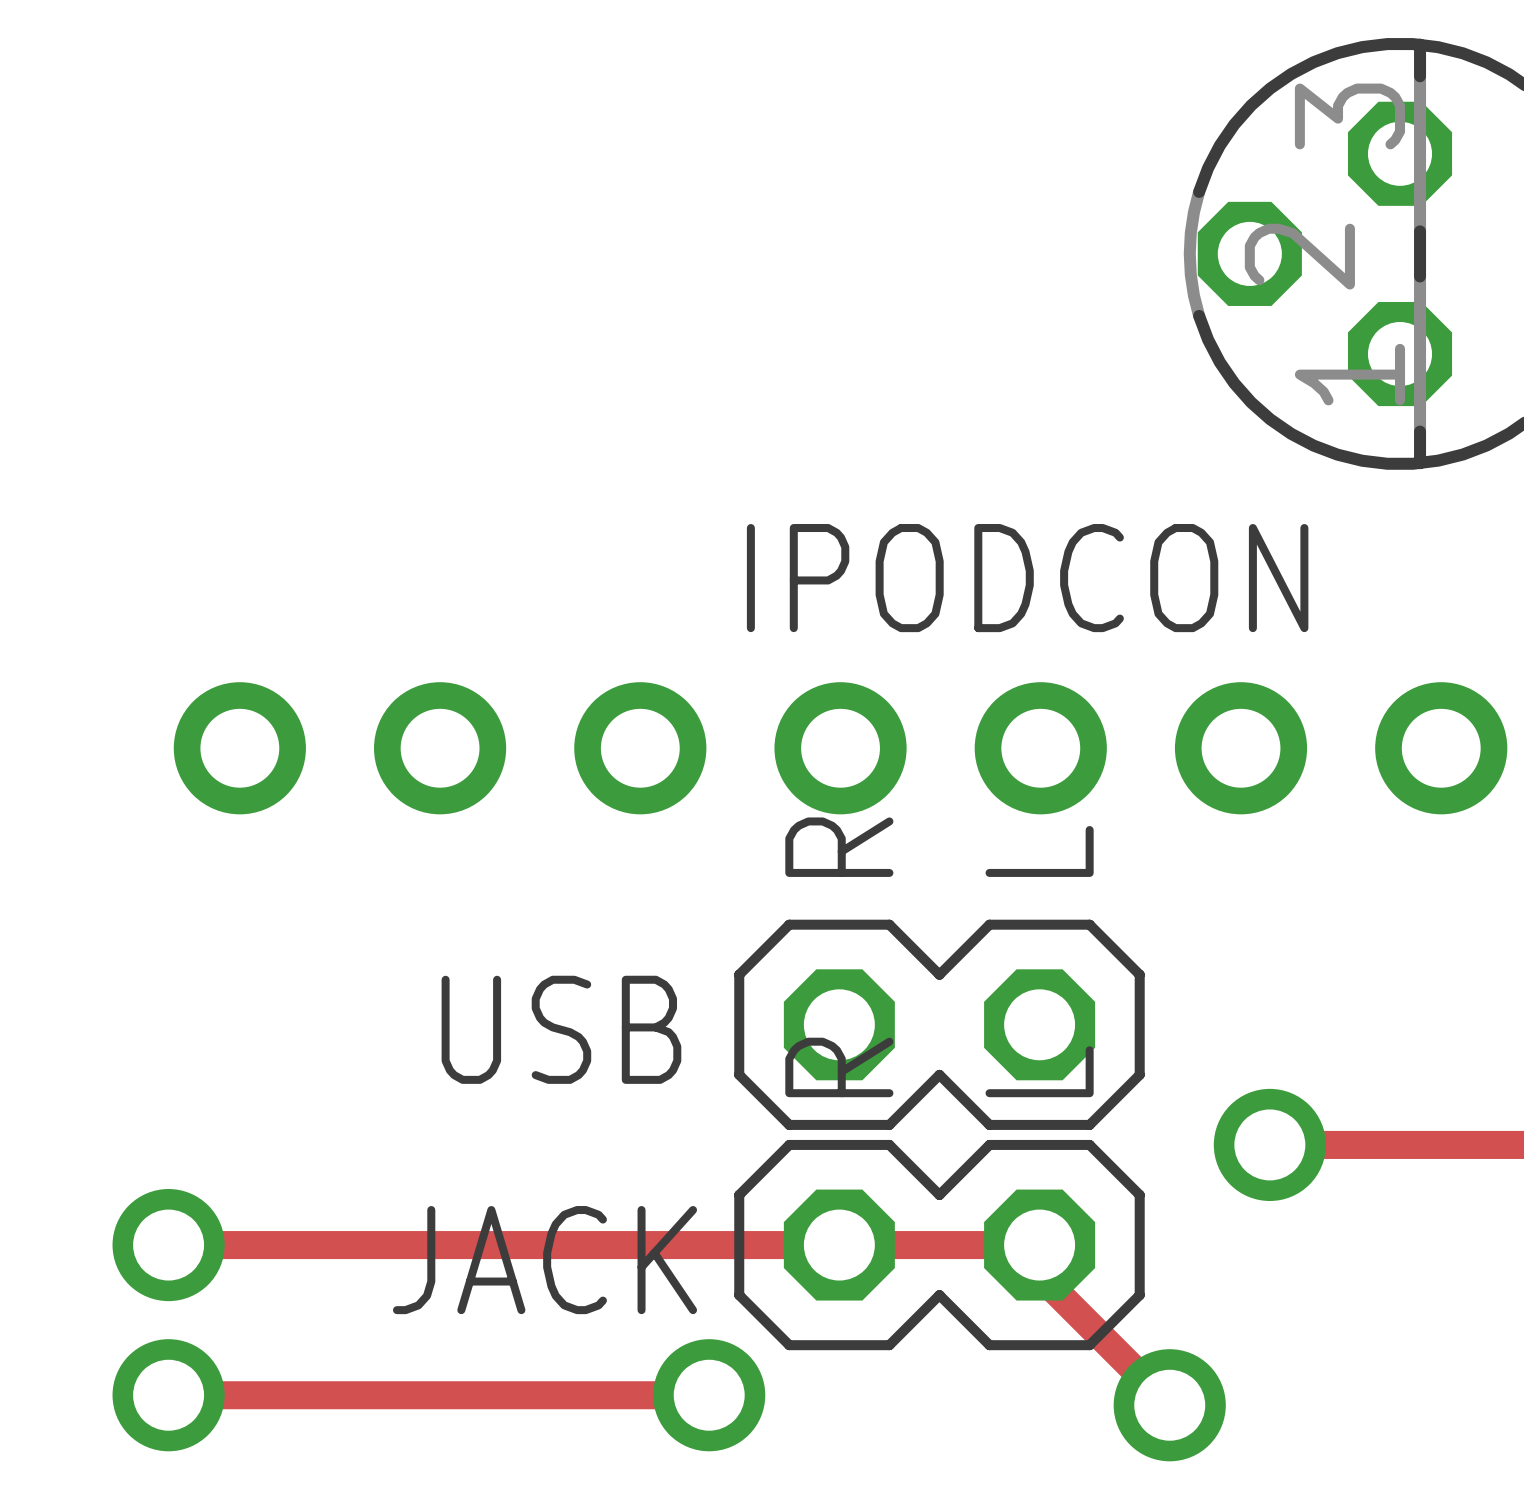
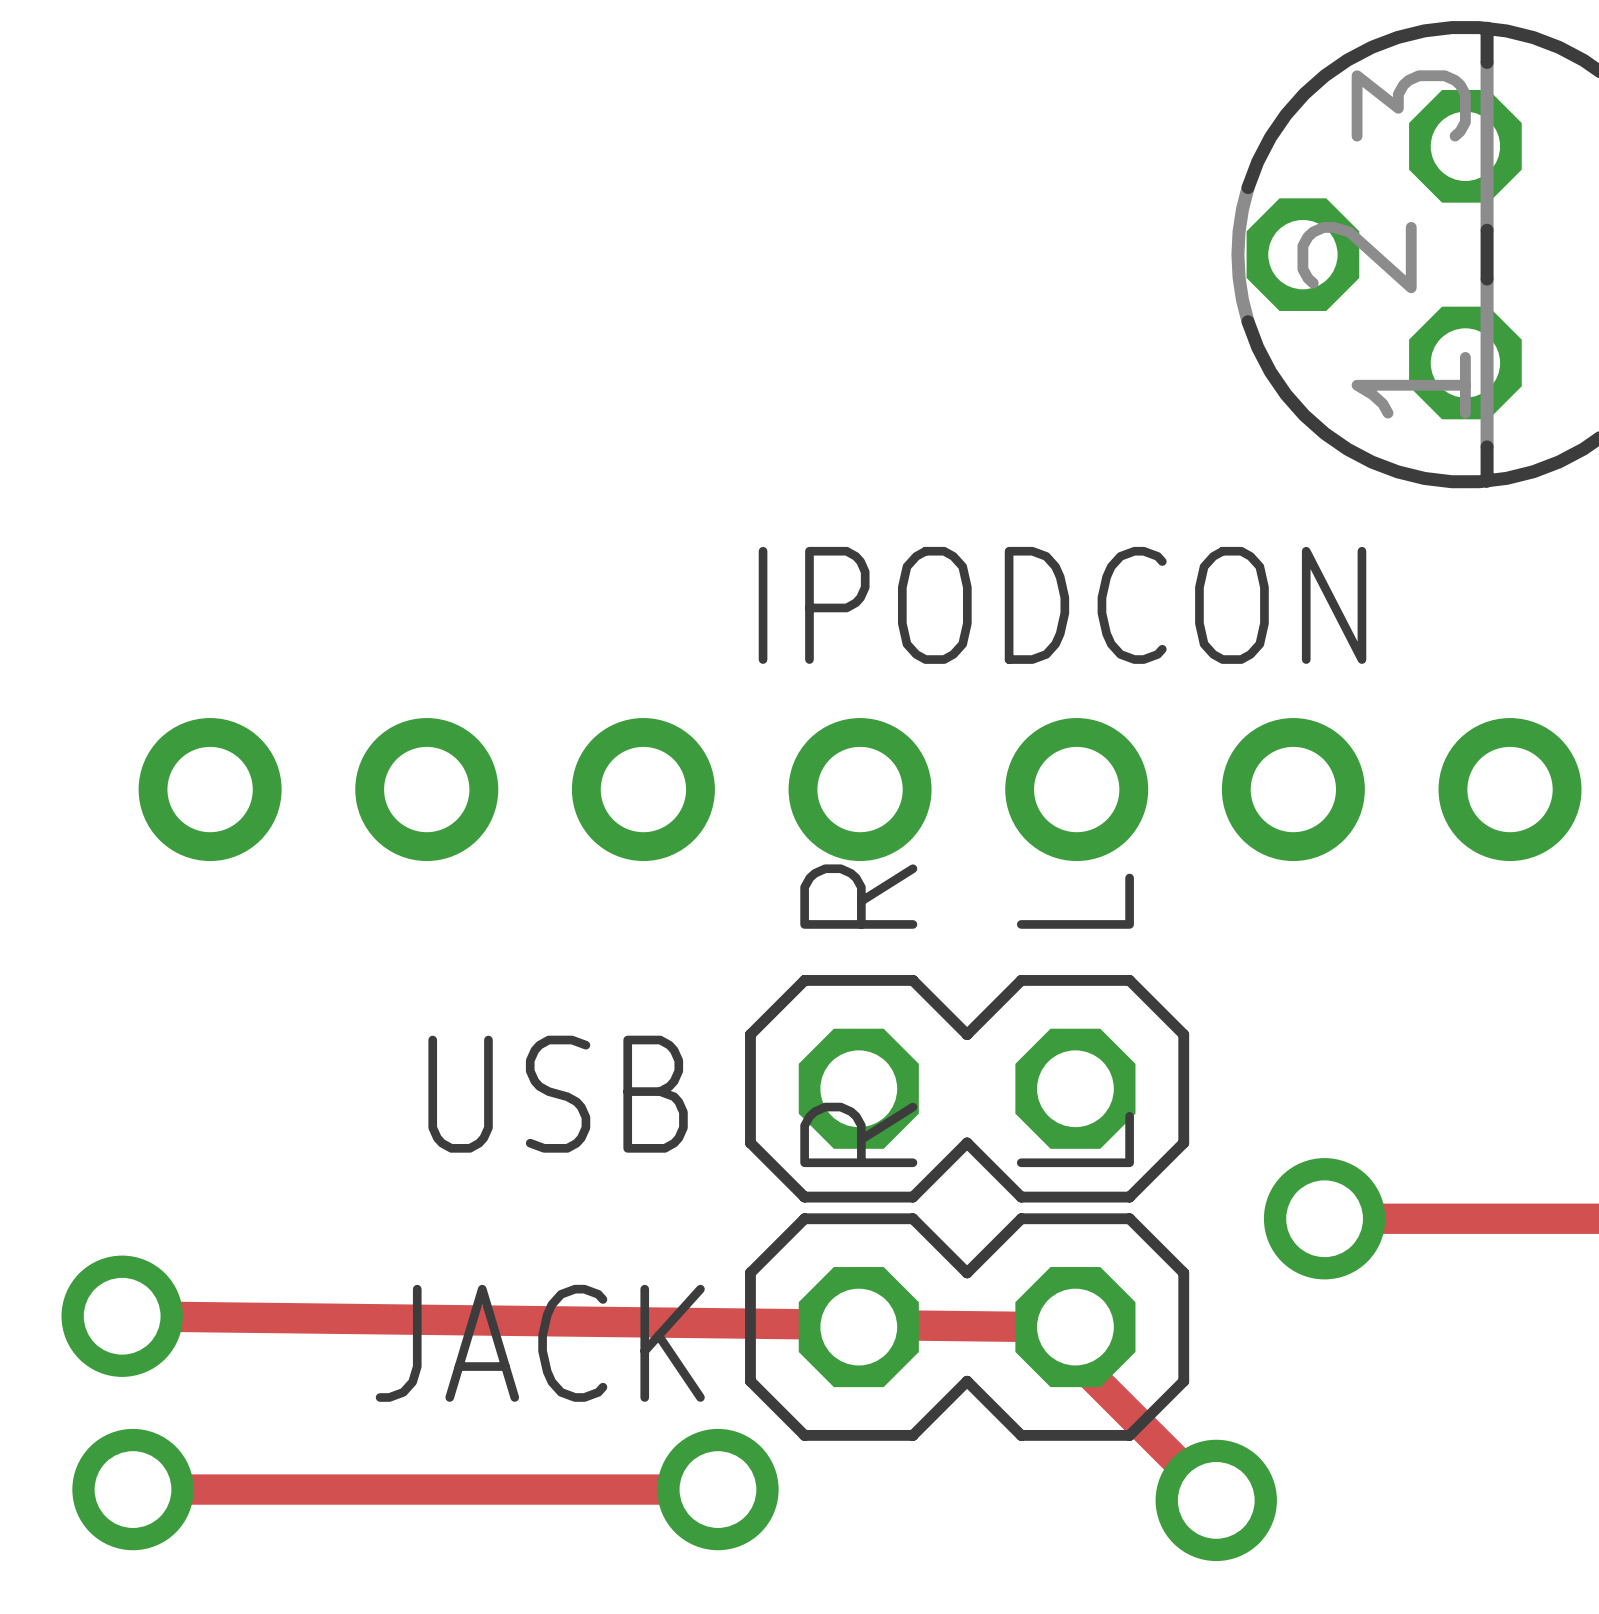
track: (168, 1245) (1009, 1245) -> (122, 1316) (1042, 1327)
via position: (168, 1245) -> (122, 1316)

